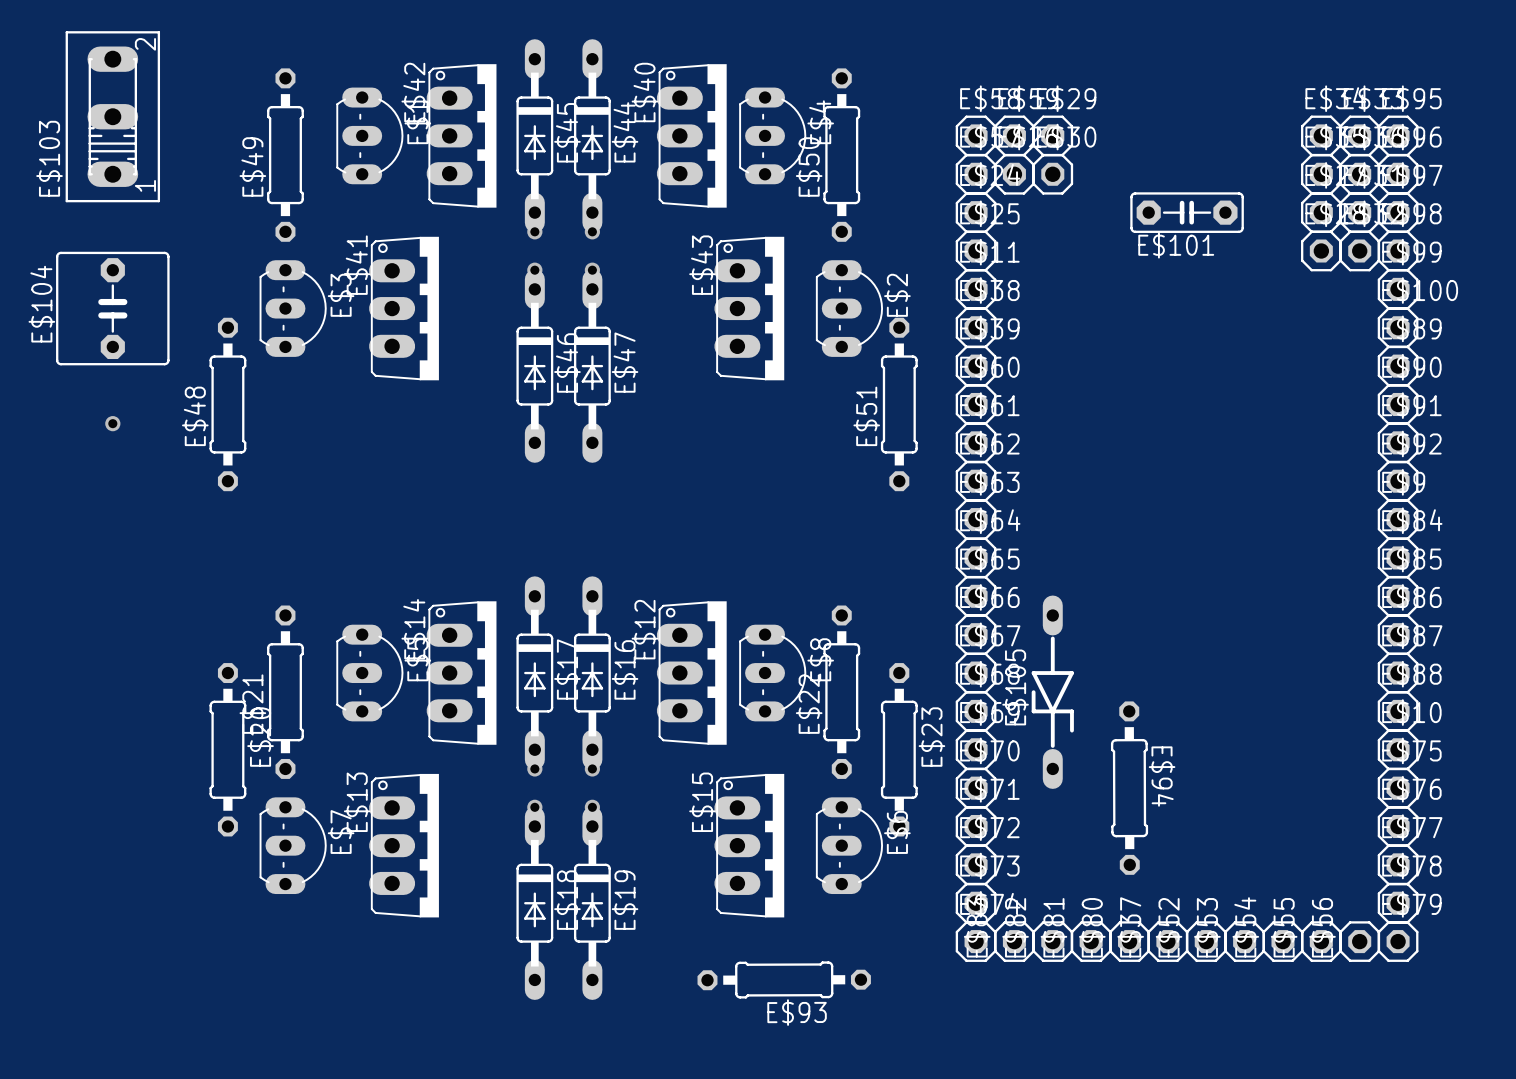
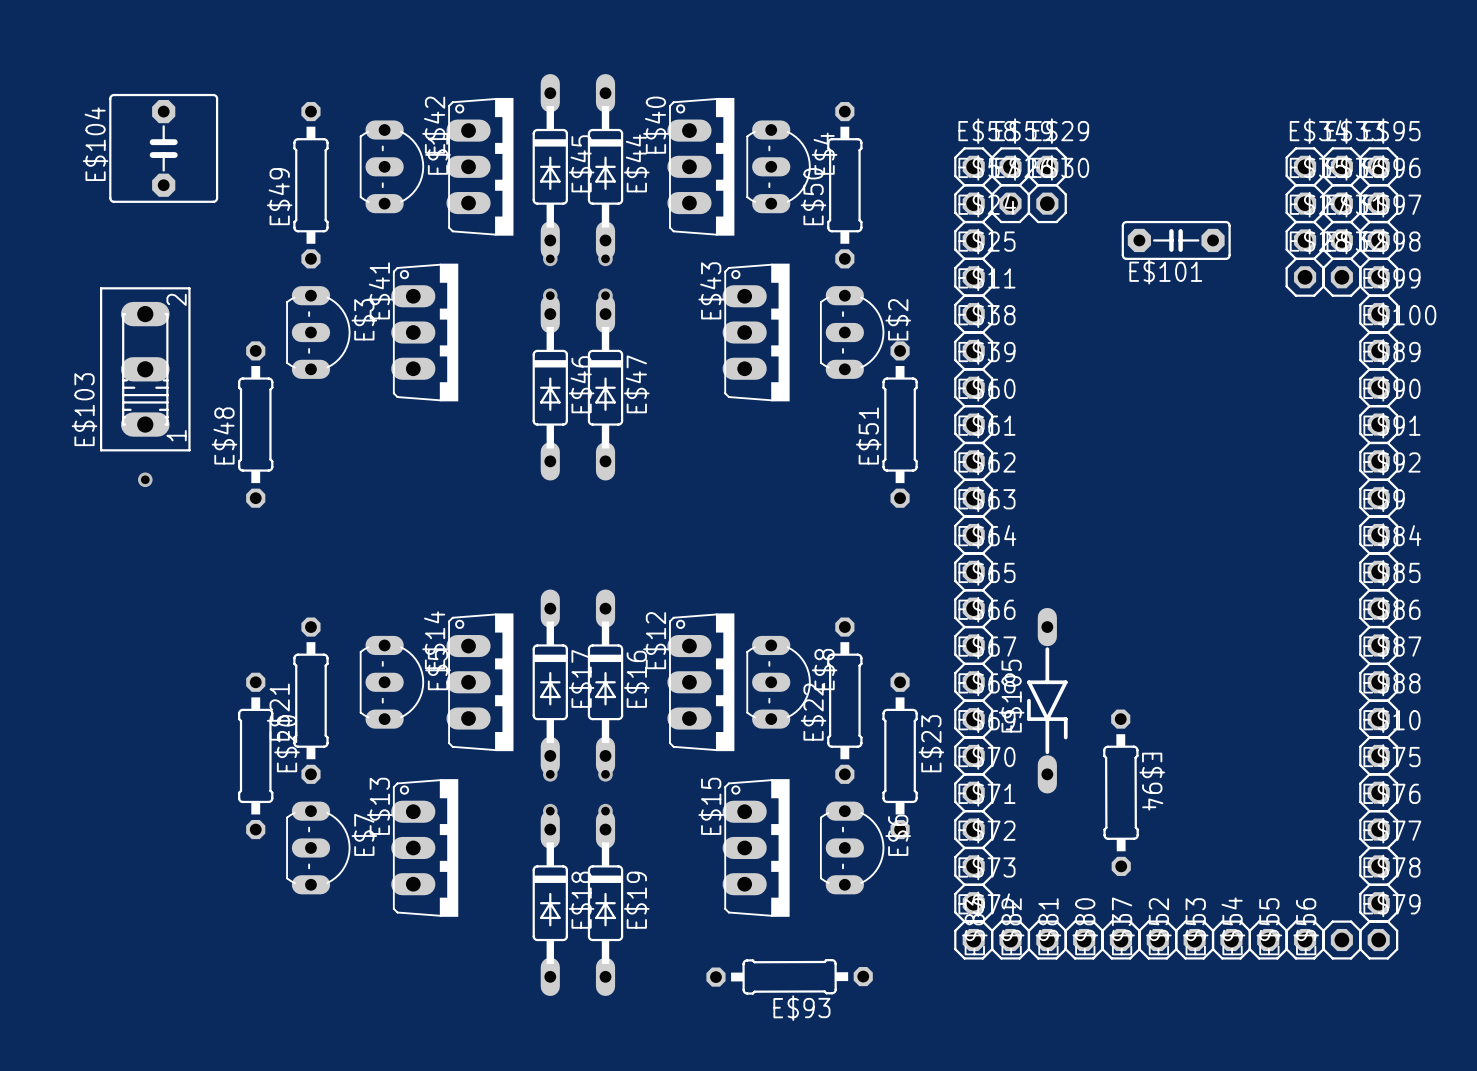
E$103 position: (112, 116) -> (145, 369)
E$104 position: (112, 308) -> (163, 148)
via position: (112, 423) -> (145, 479)

